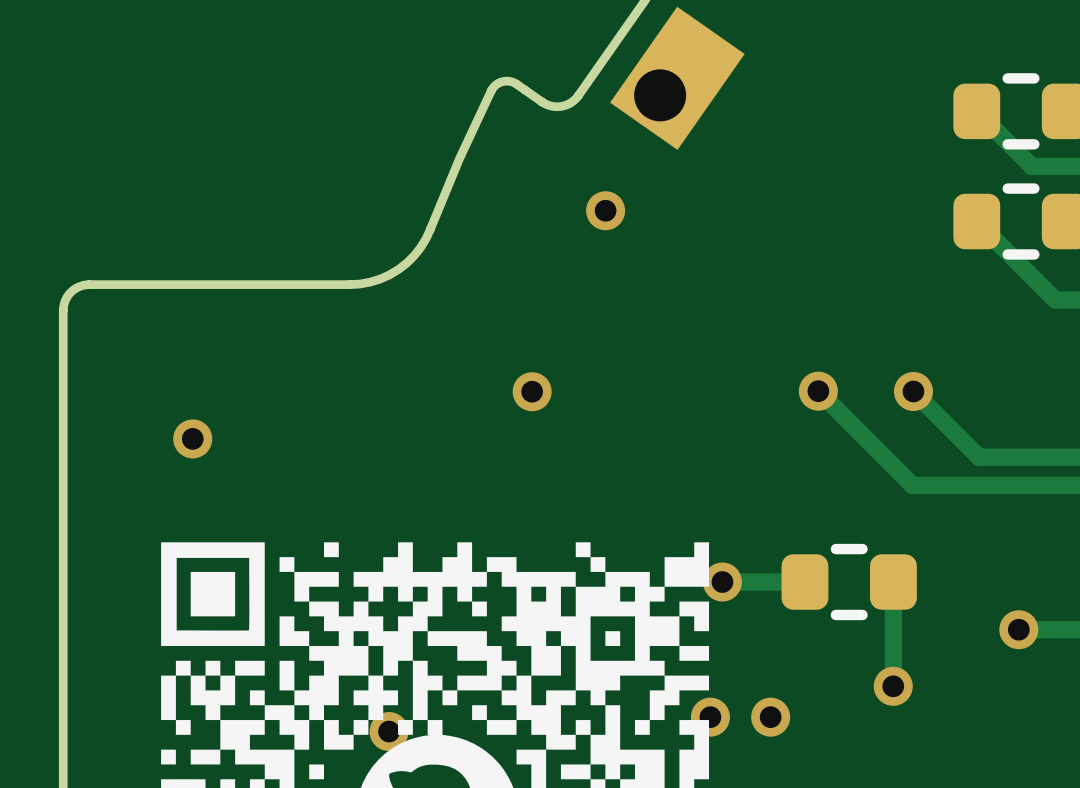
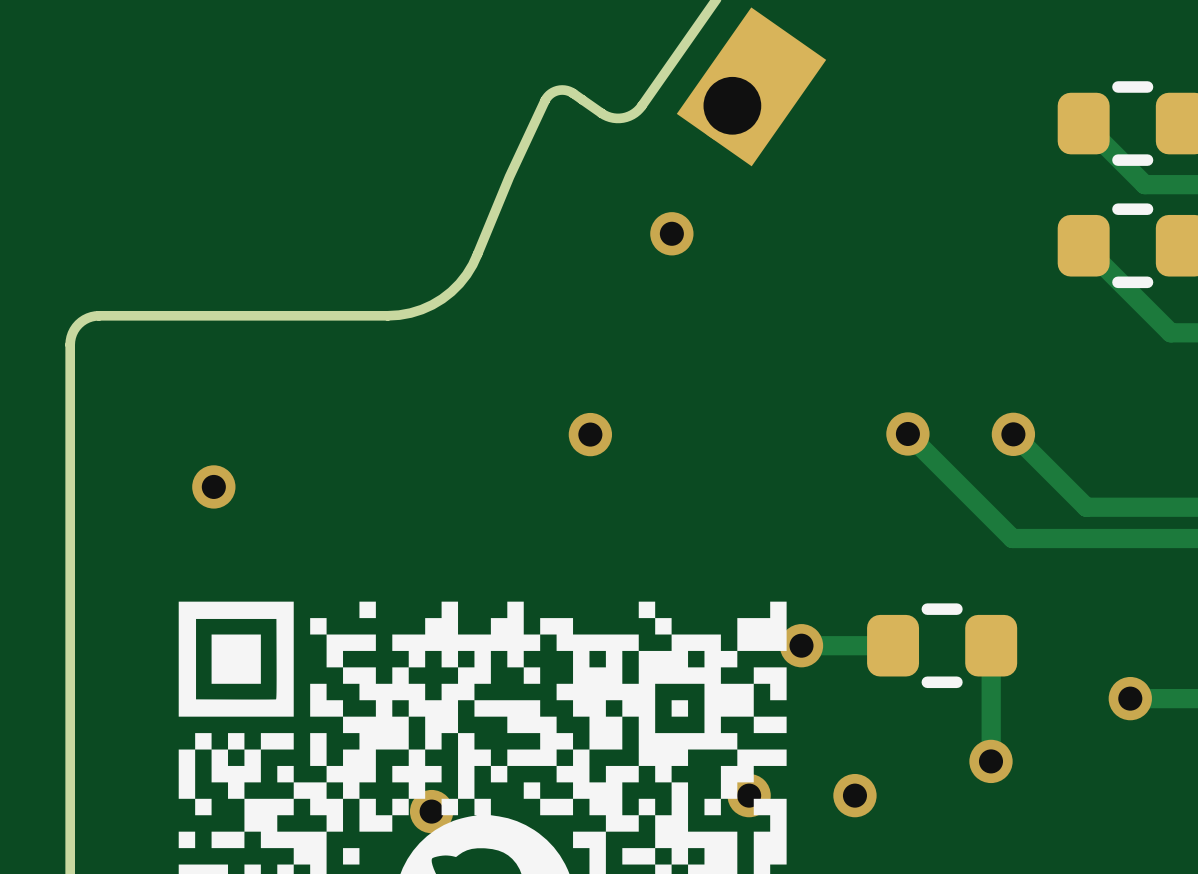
via position: (710, 717) -> (749, 795)

